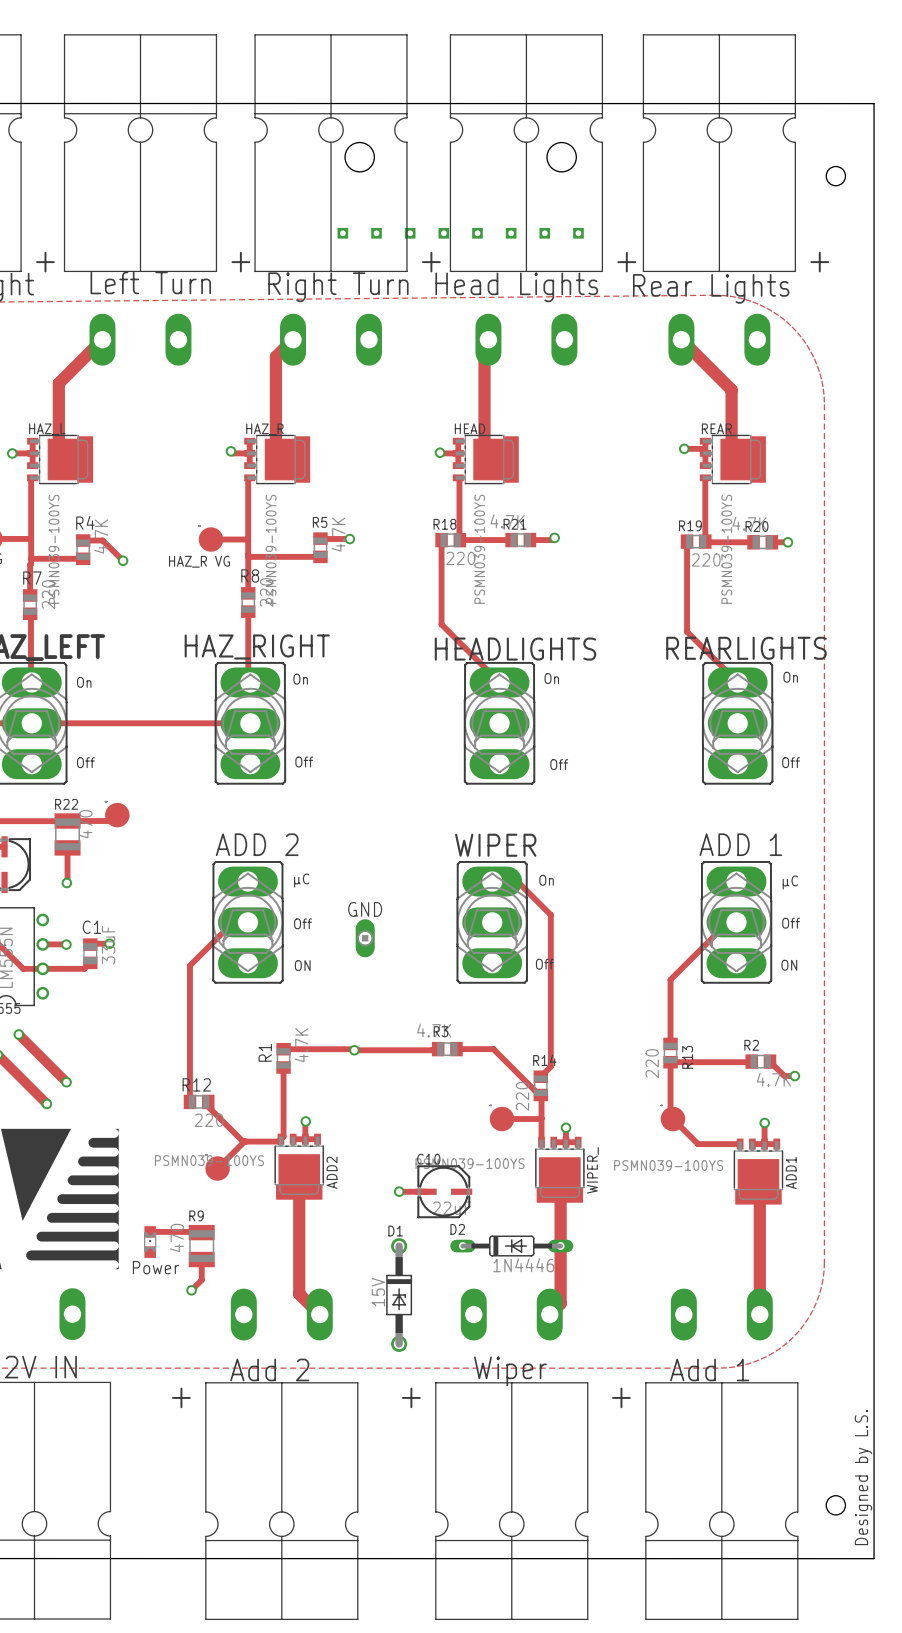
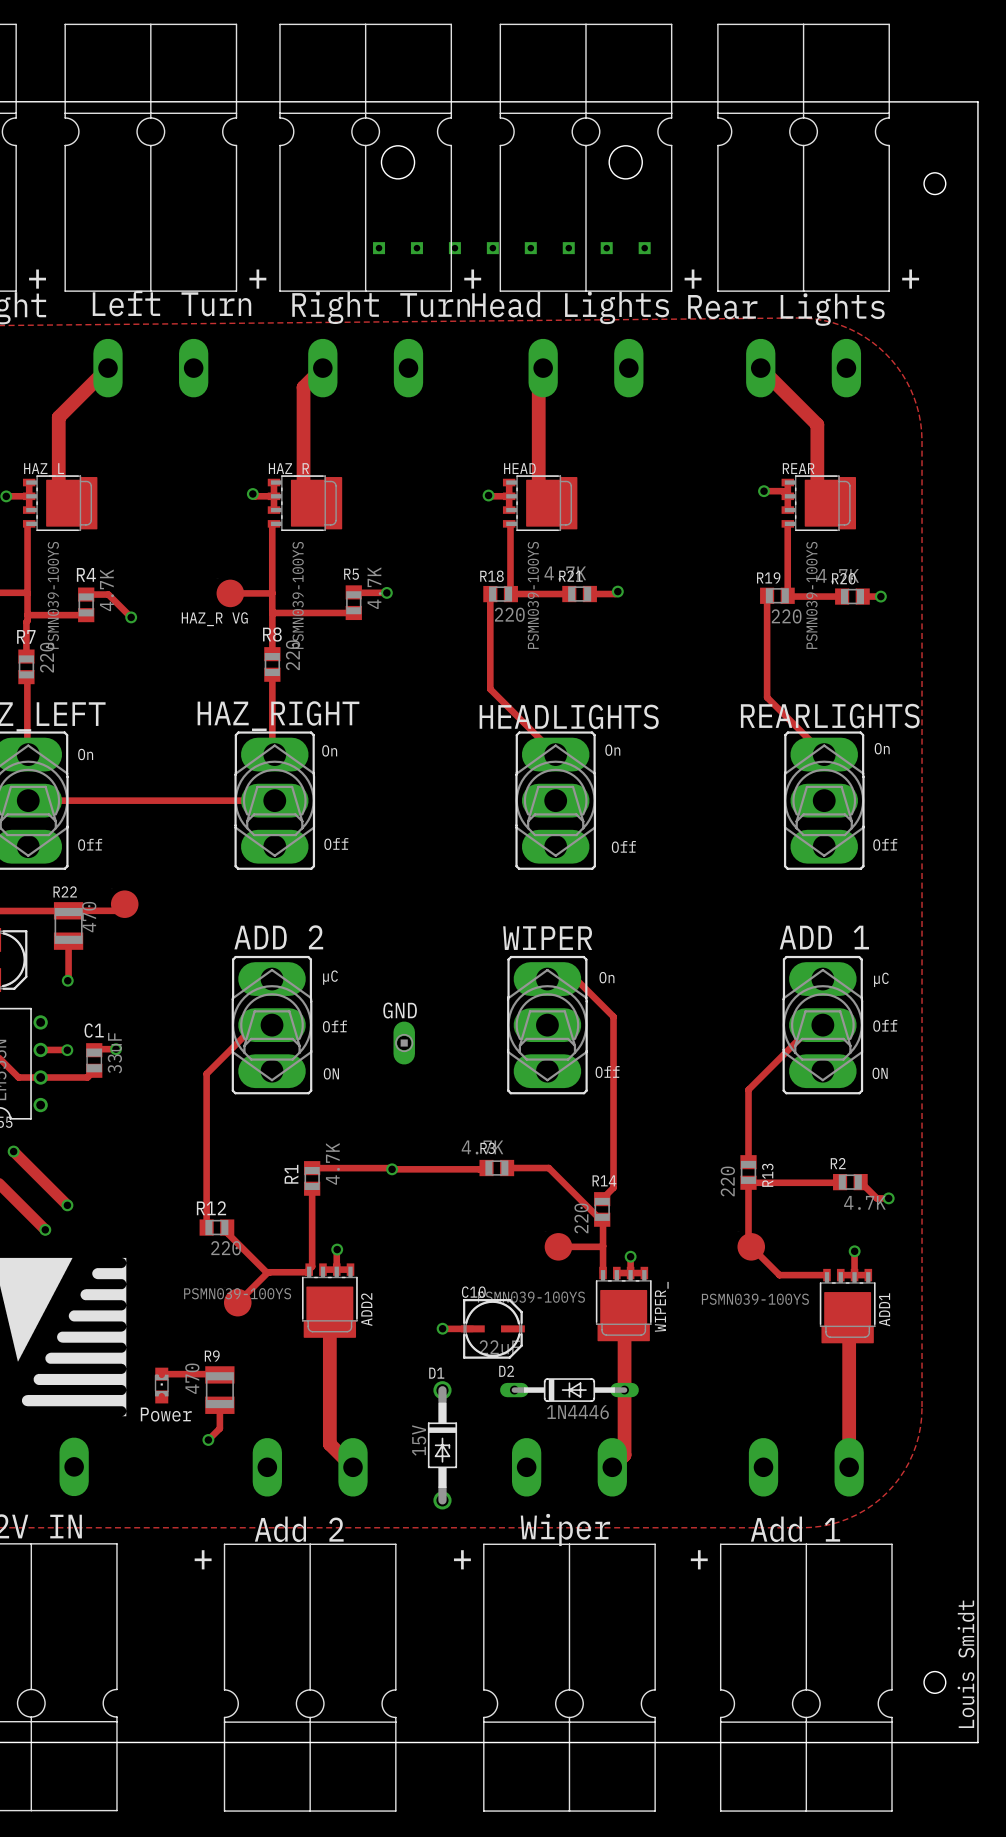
text: Designed by L.S. (863, 1477) -> Louis Smidt (966, 1664)

